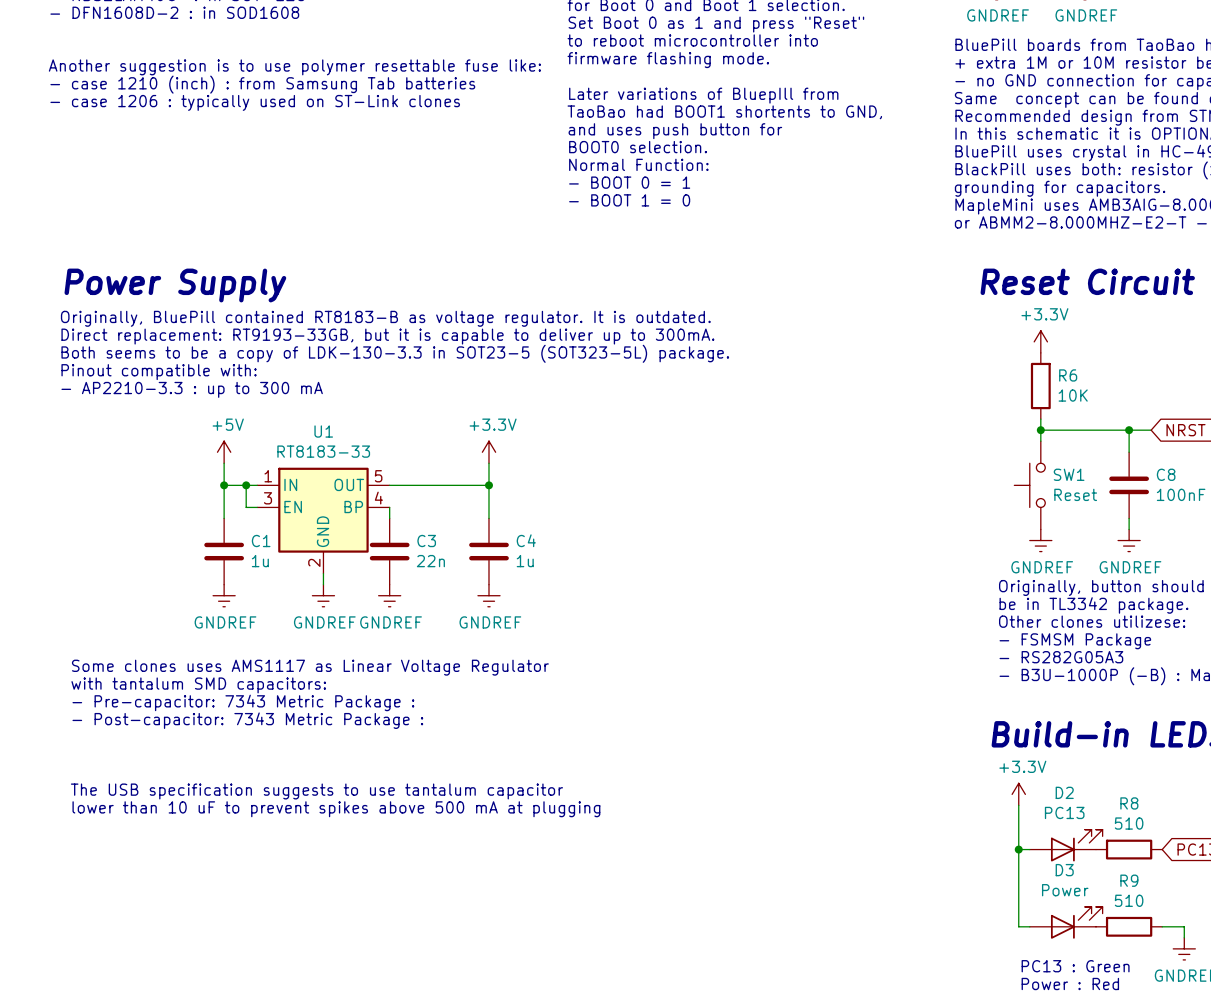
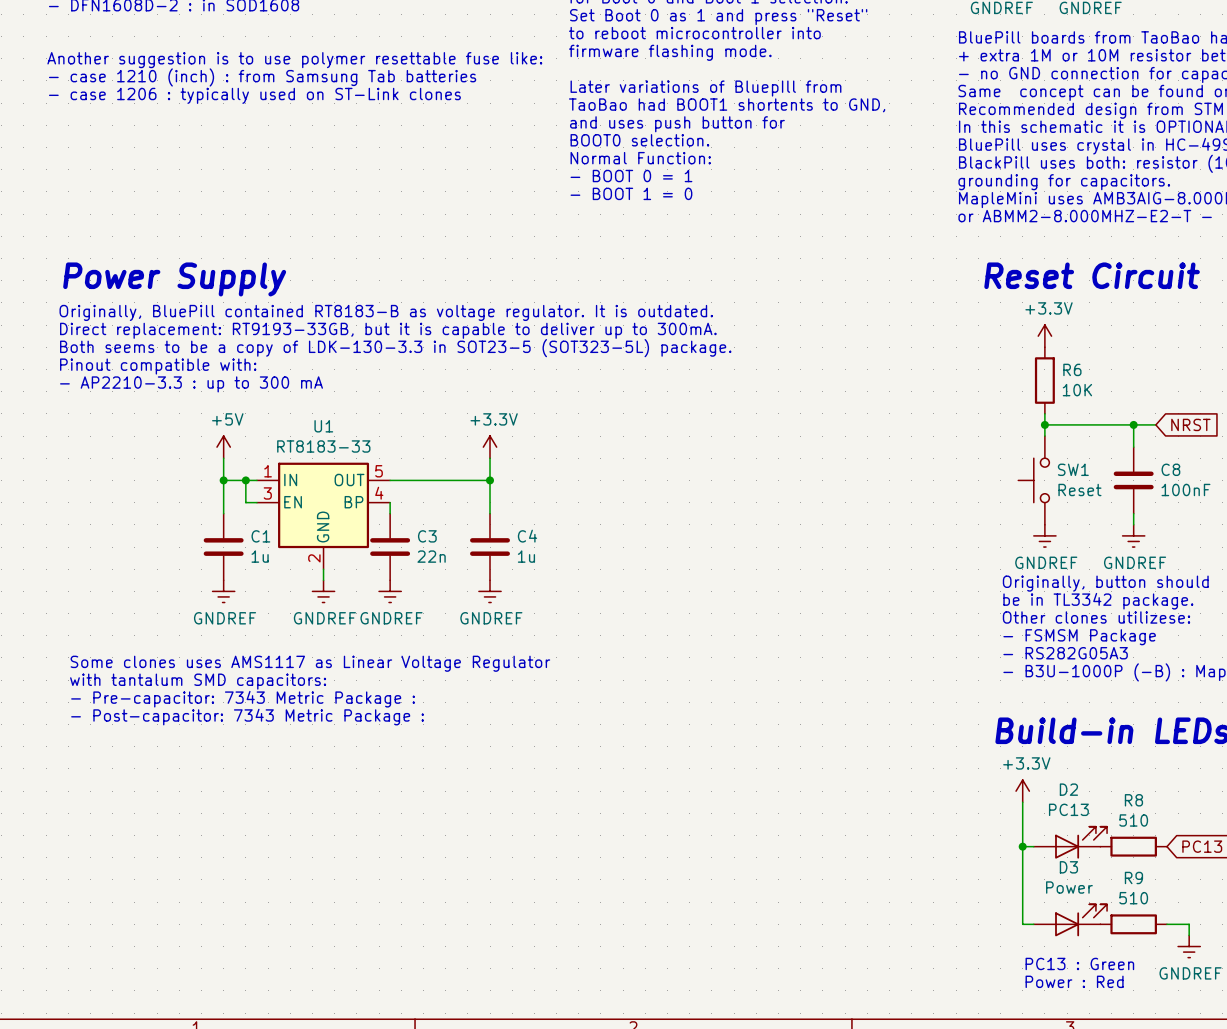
text: The USB specification suggests to use tantalum capacitor (316, 791) -> none
text: lower than 10 uF to prevent spikes above 500 mA at plugging (336, 809) -> none

